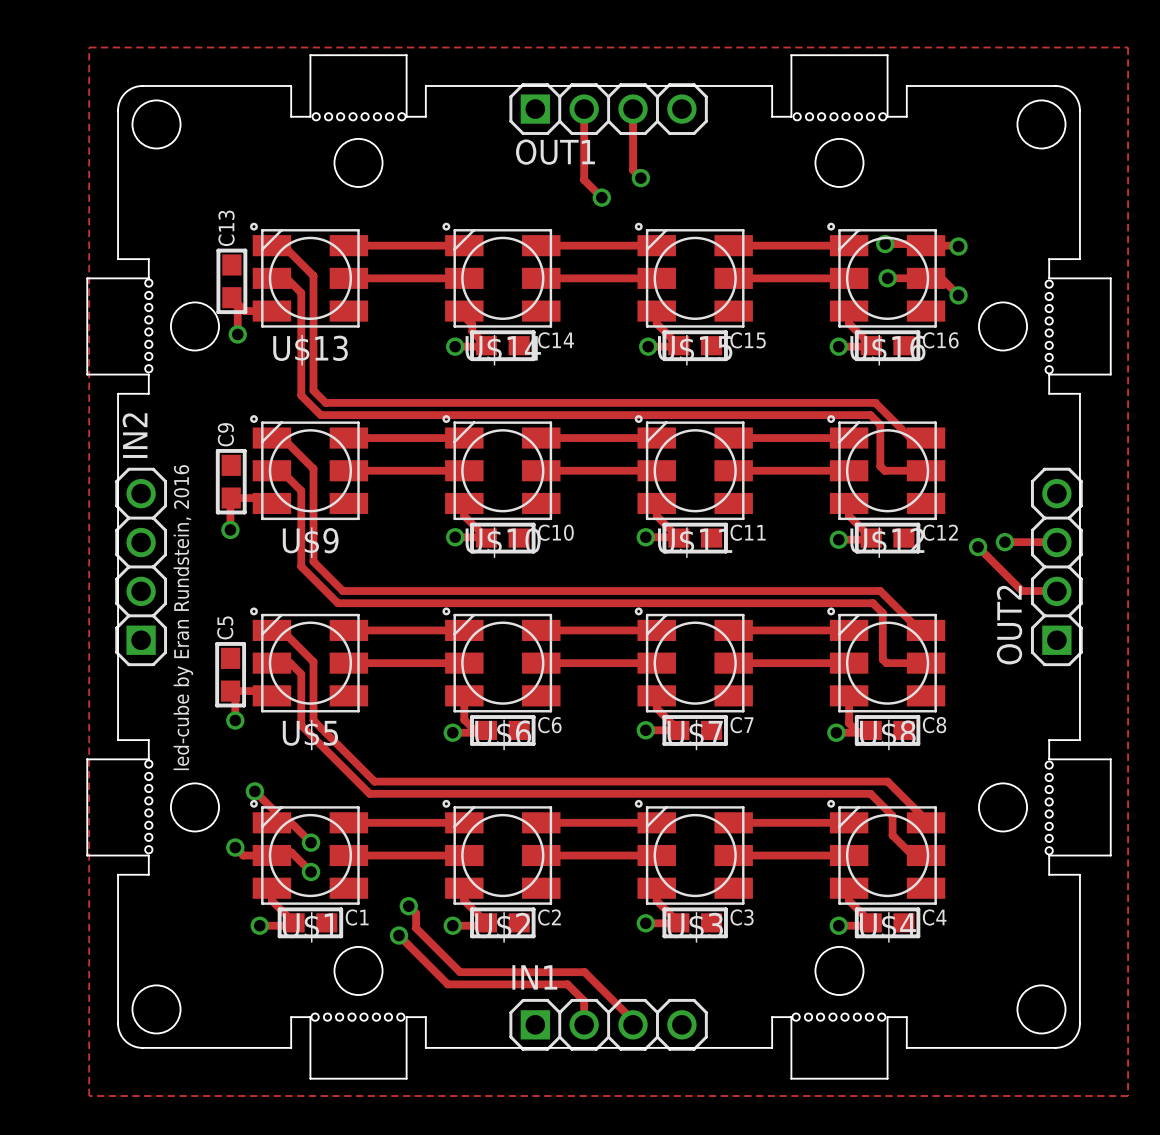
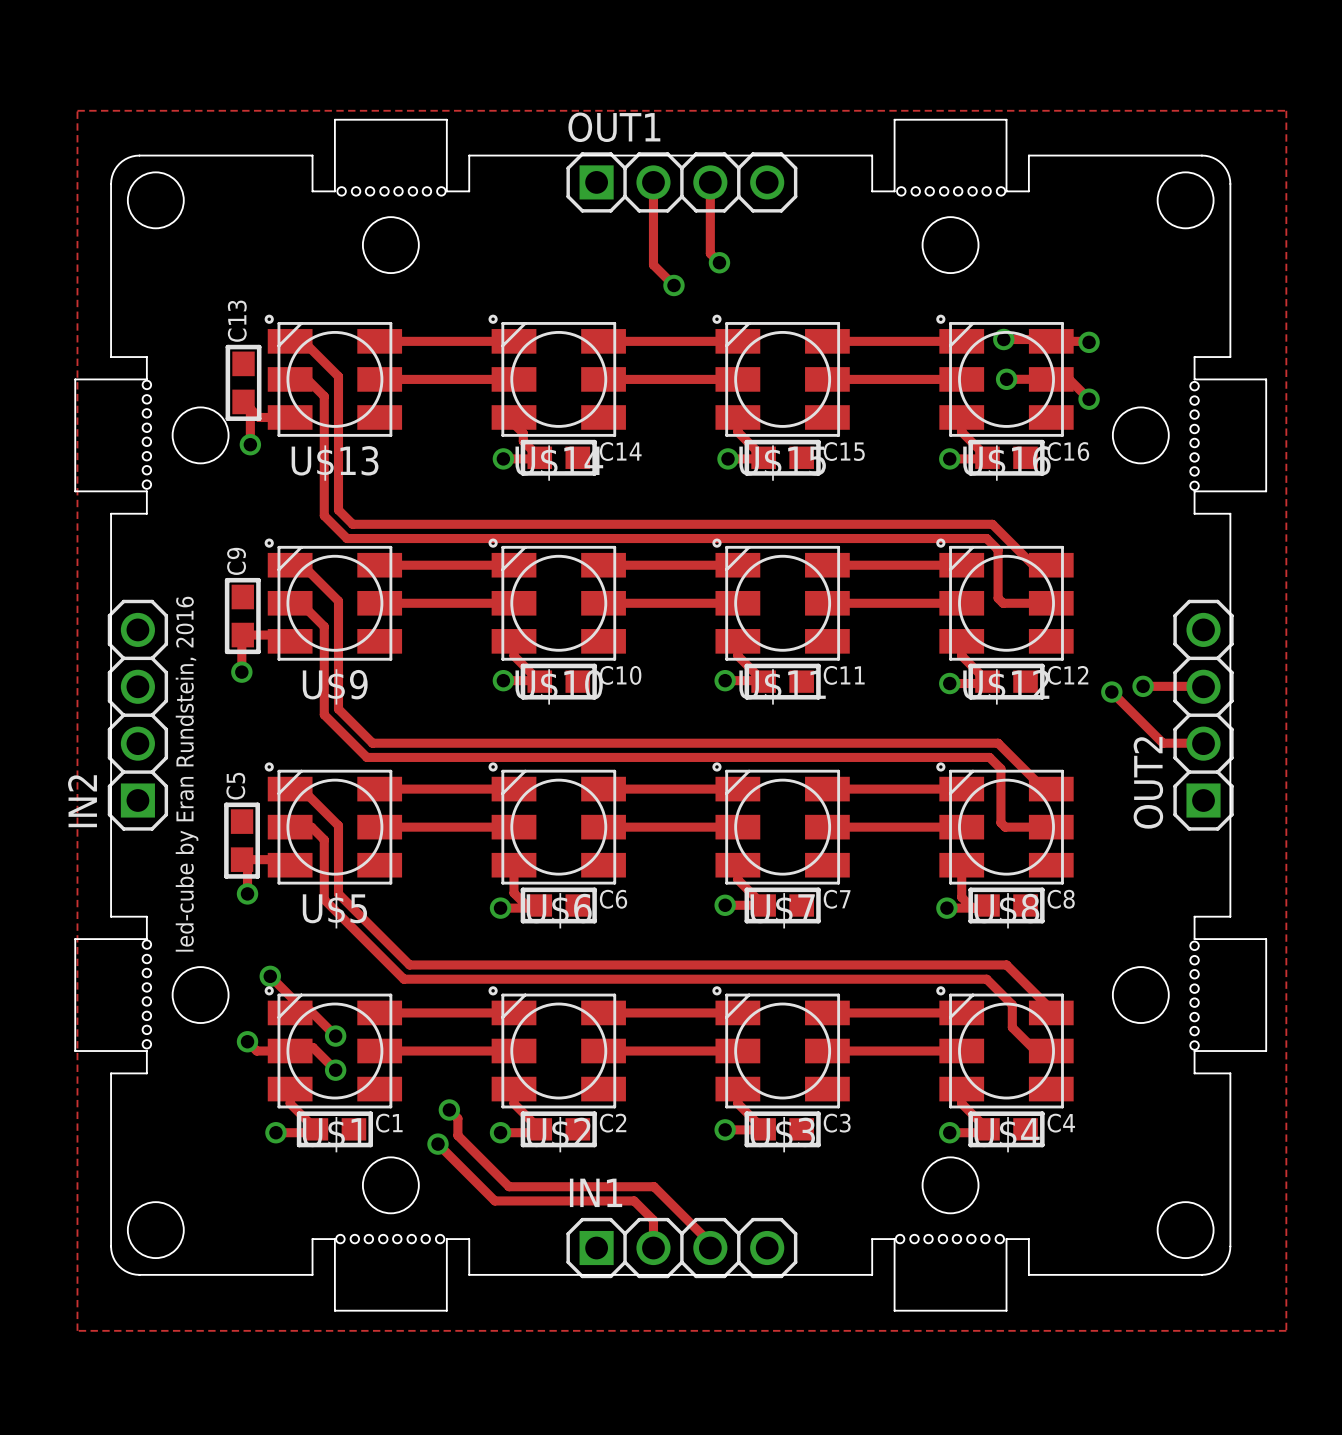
OUT1 name position: OUT1 (555, 152) -> OUT1 (614, 127)
IN2 name position: IN2 (135, 435) -> IN2 (82, 801)

